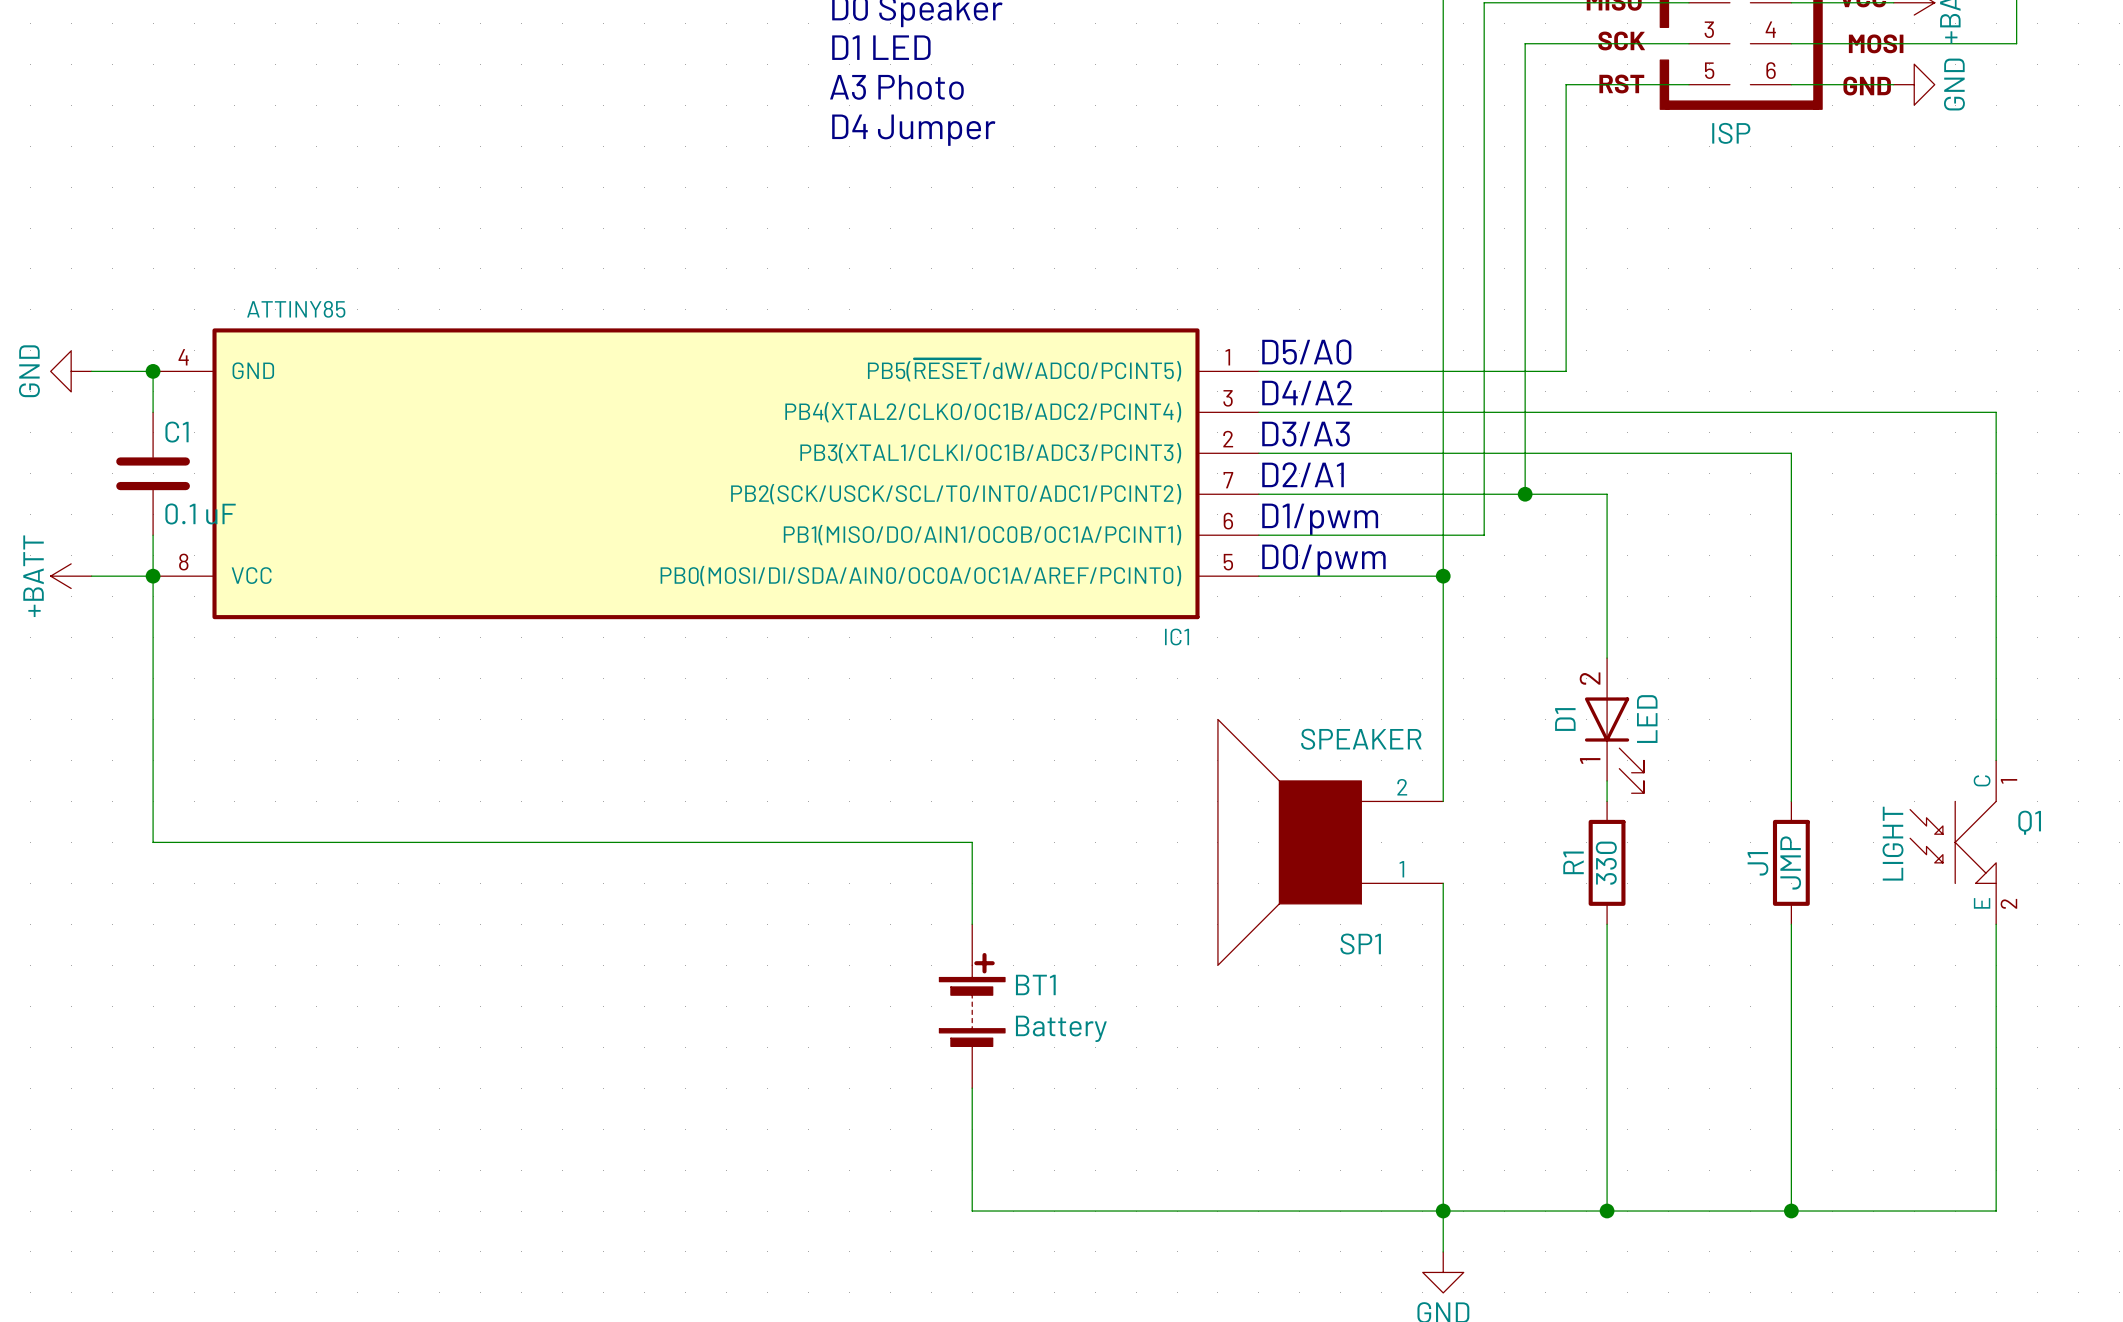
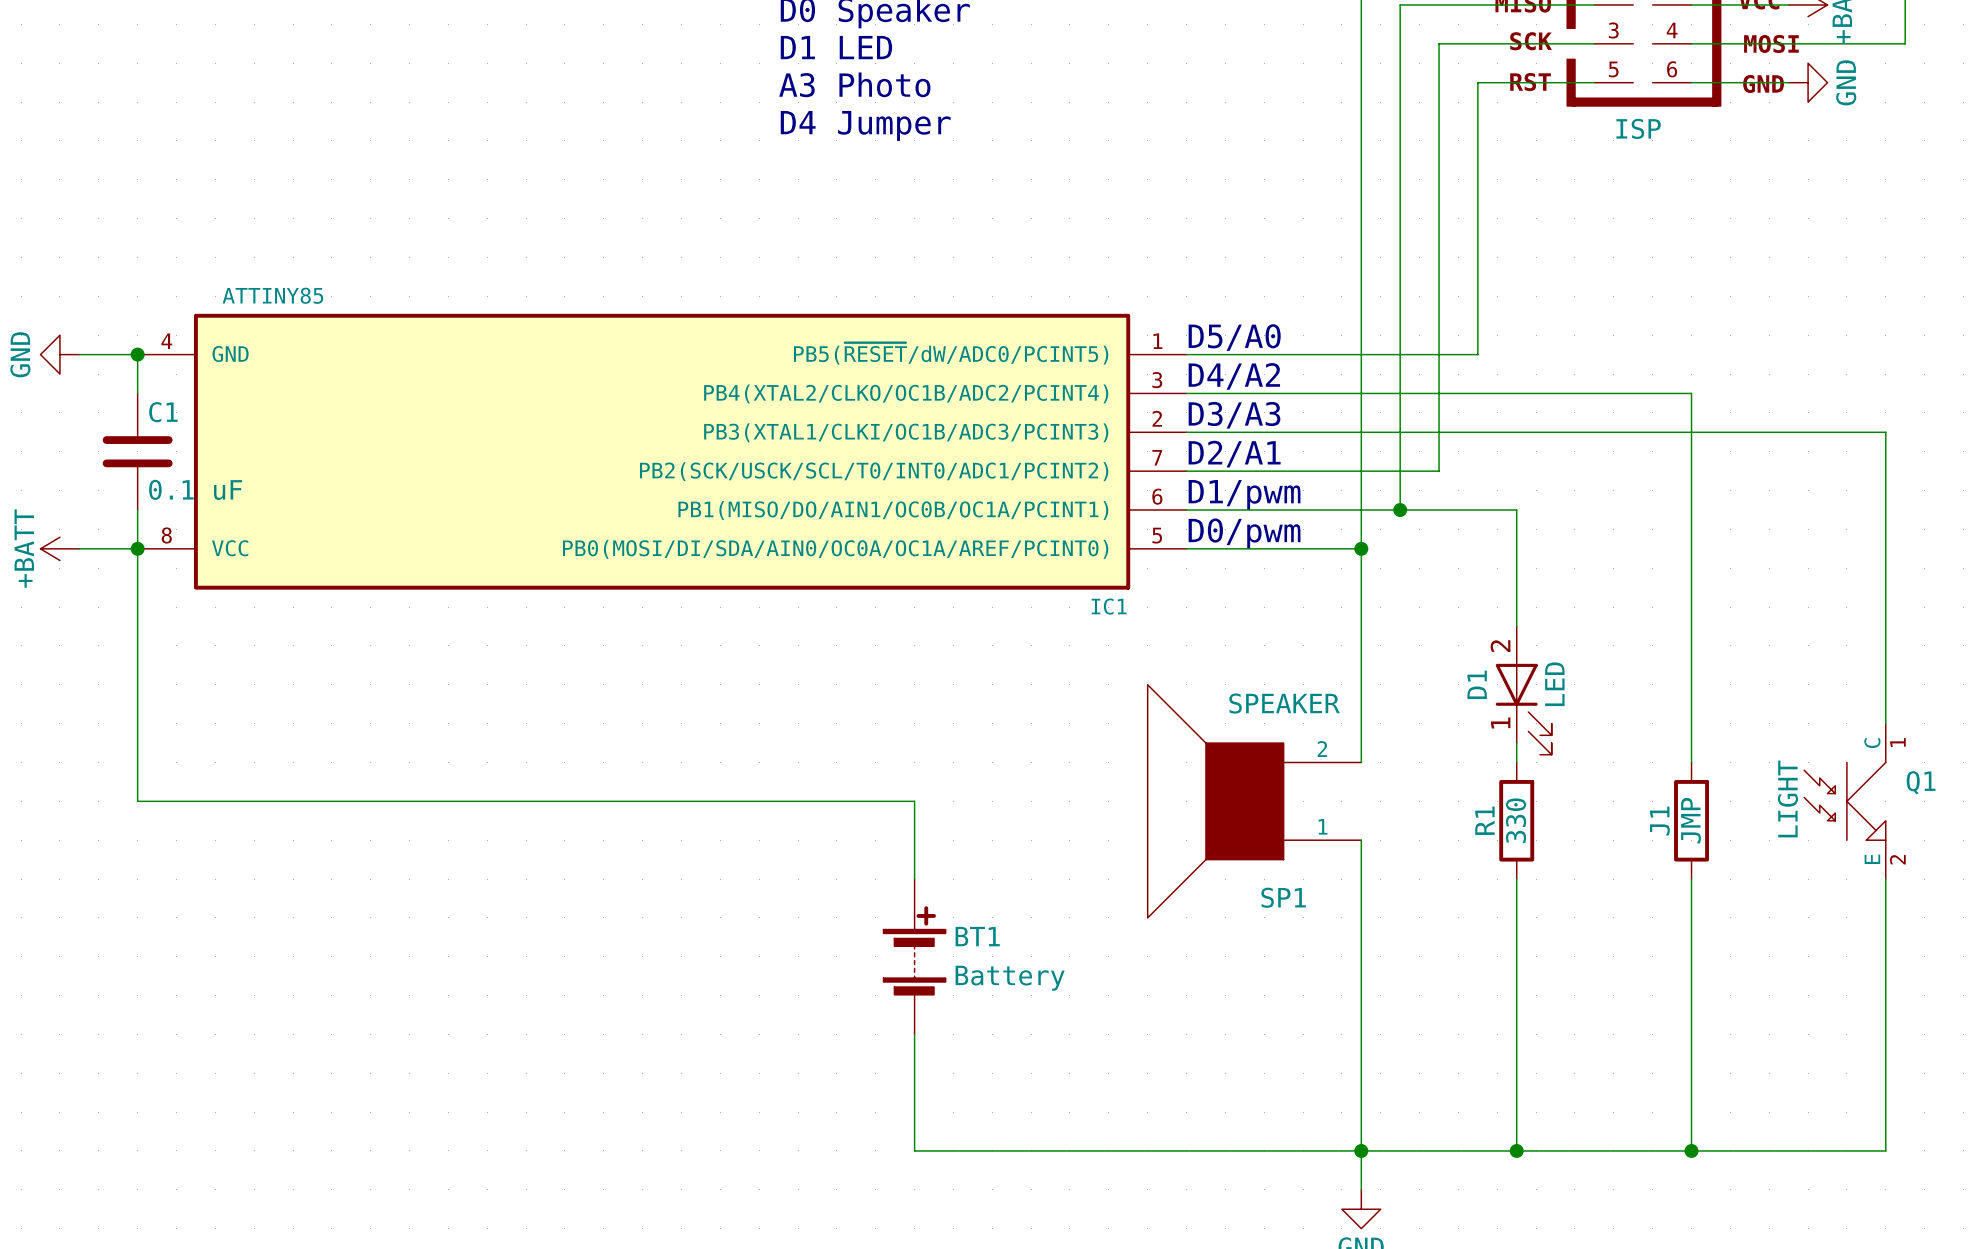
wire: (1791, 412) (1996, 412) (1996, 453) -> (1691, 393) (1691, 432) (1885, 432)
wire: (1525, 494) (1607, 494) (1607, 535) -> (1400, 509) (1516, 509)
junction position: (1525, 494) -> (1400, 509)

